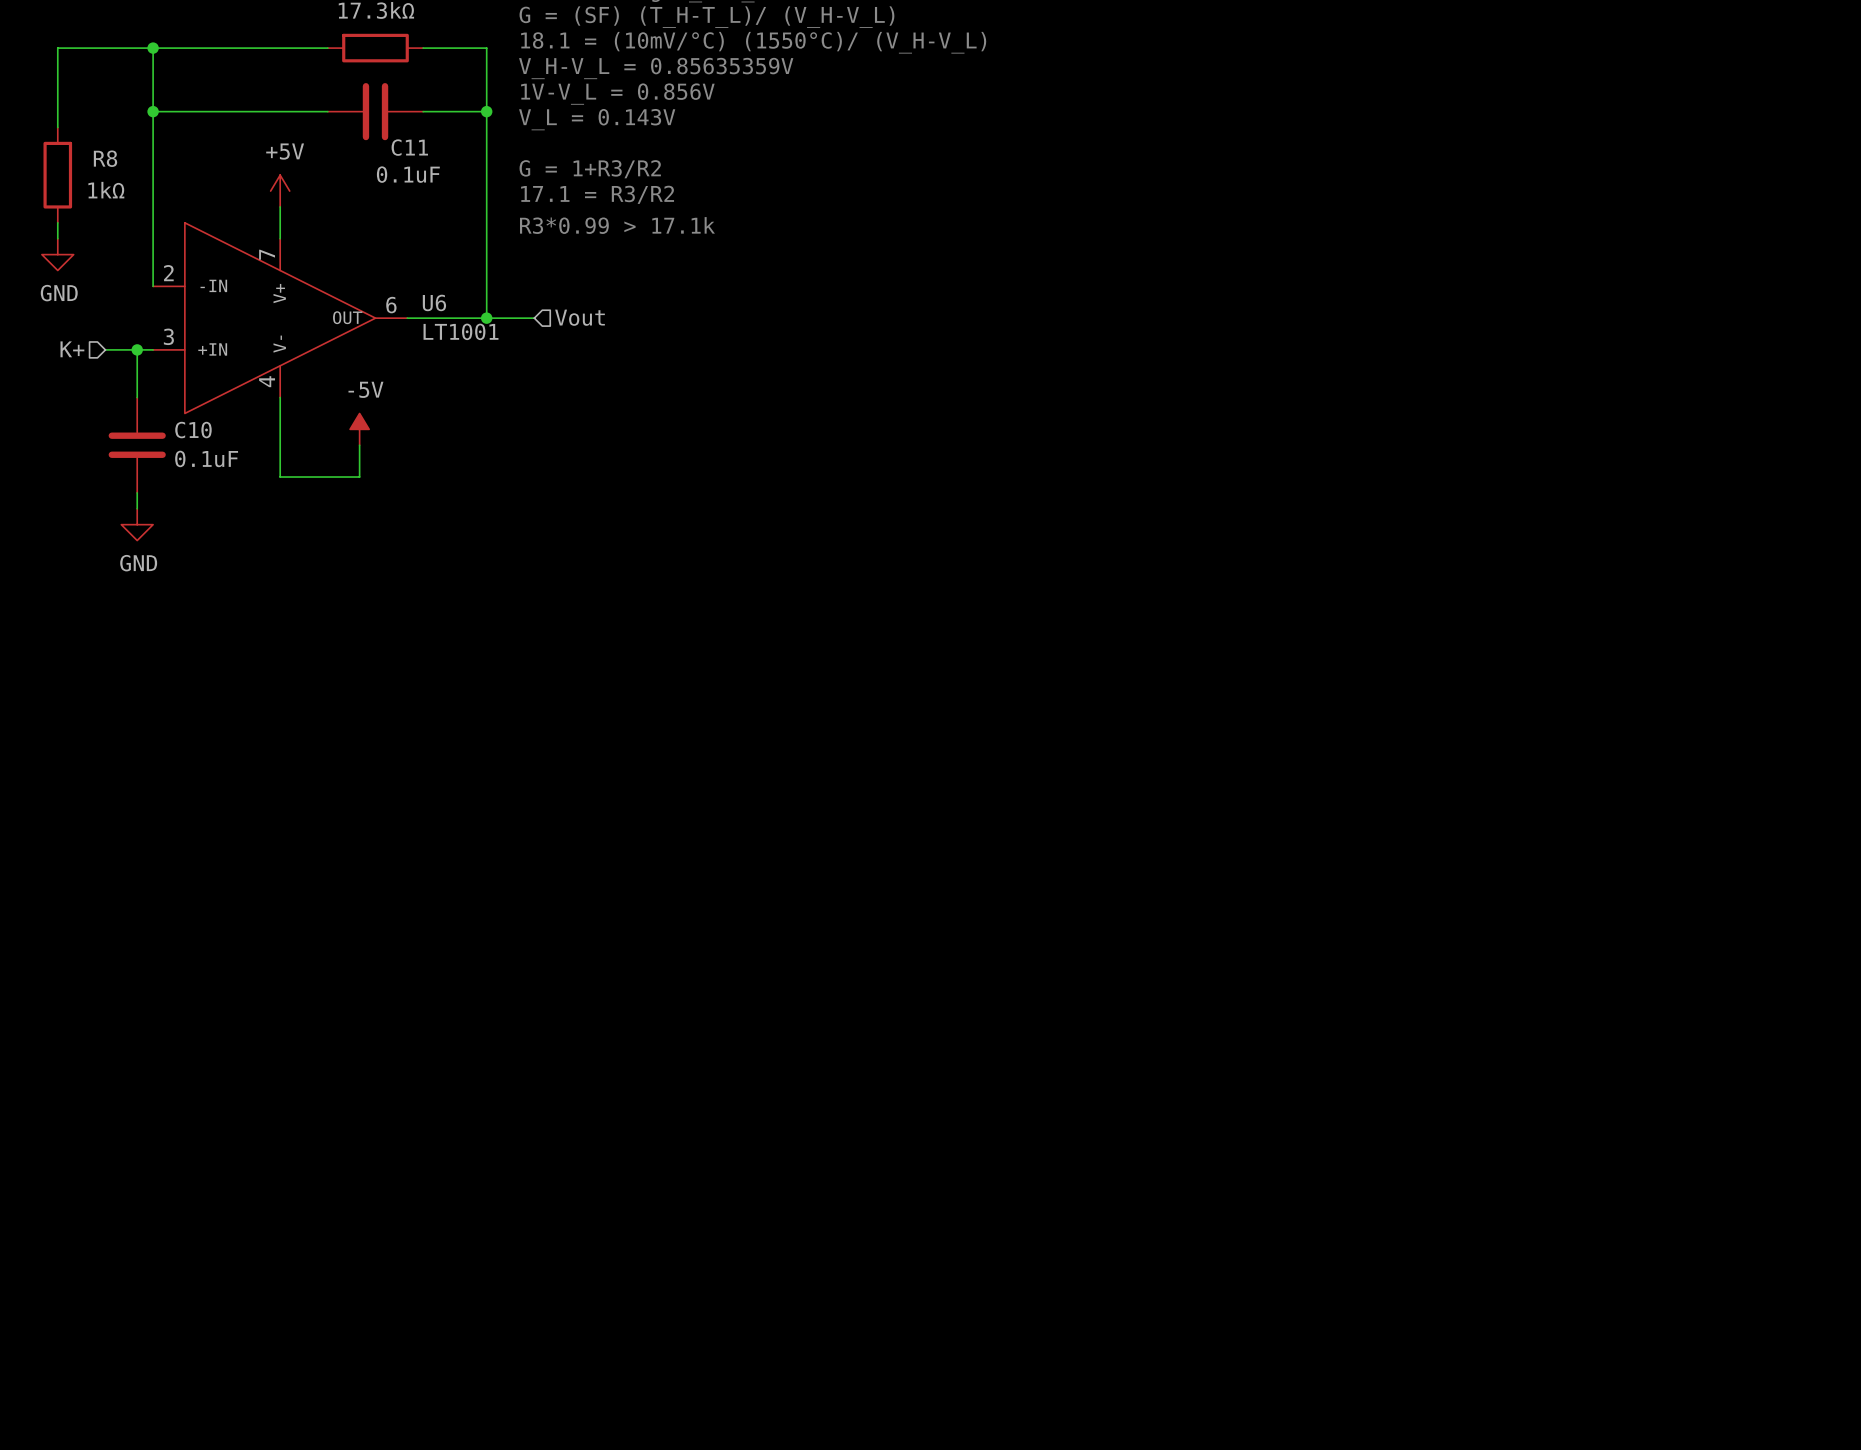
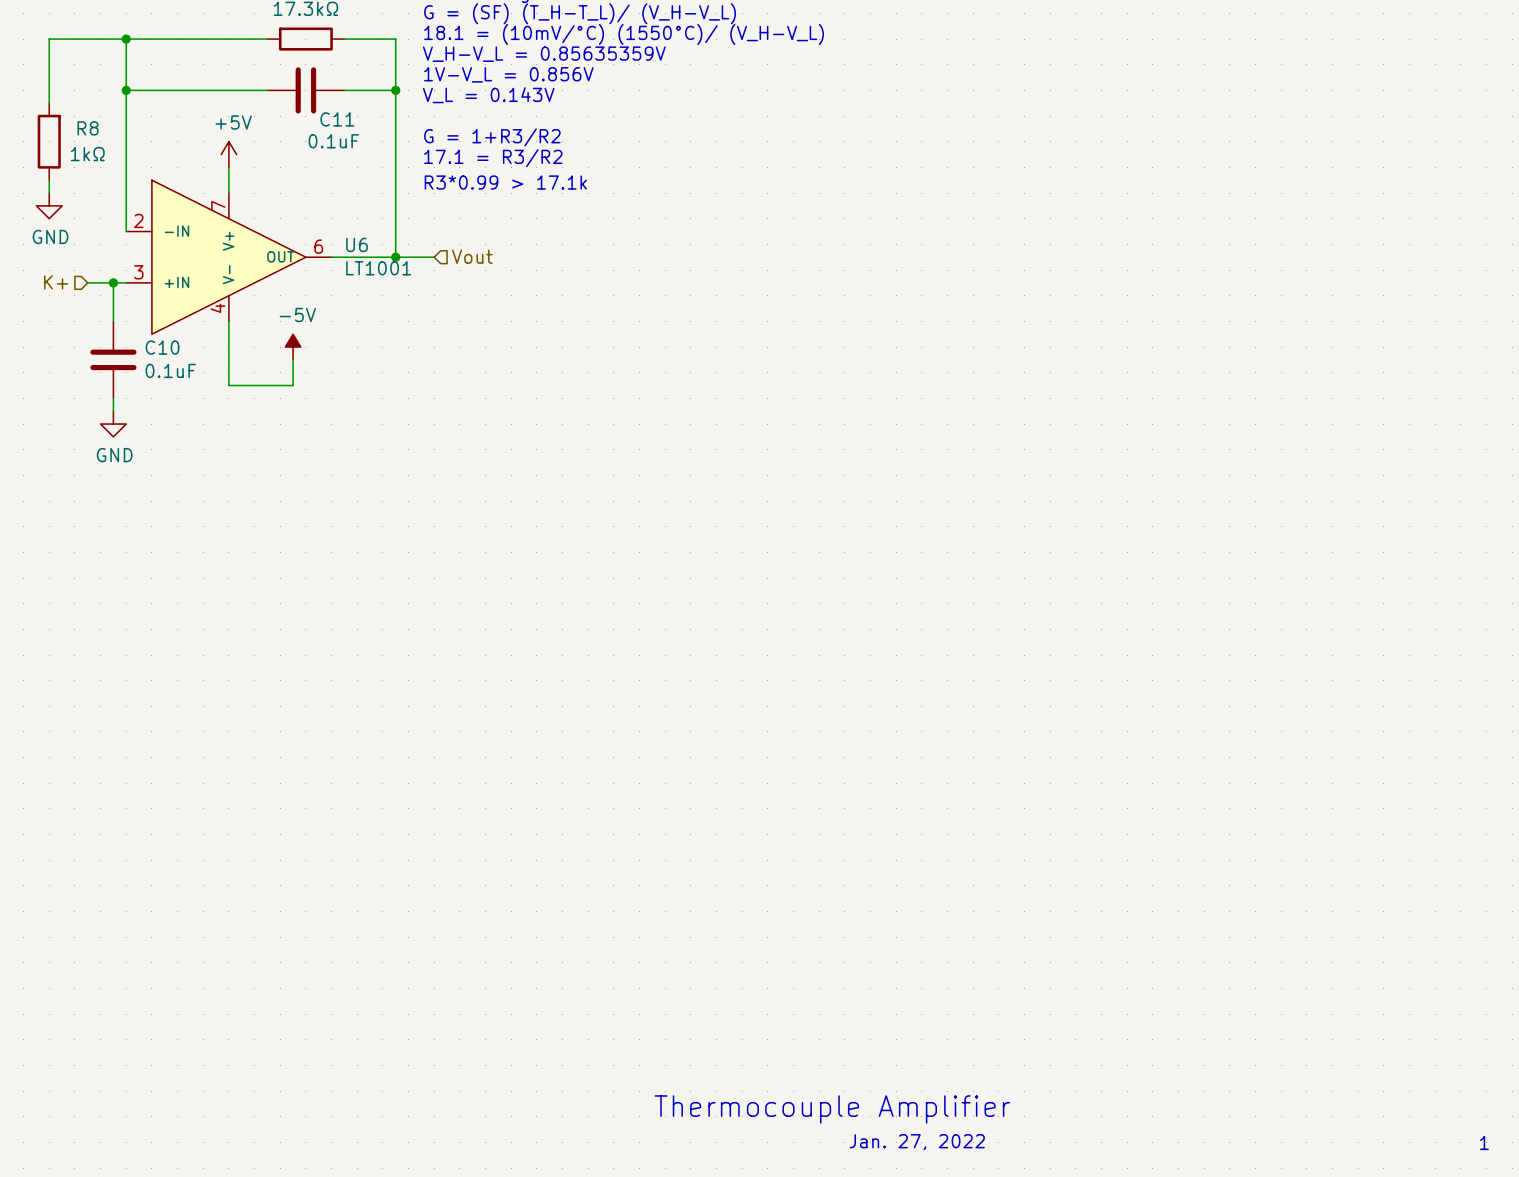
text: none -> Thermocouple Amplifier (832, 1109)
text: none -> Jan. 27, 2022 (917, 1142)
text: none -> 1 (1484, 1142)

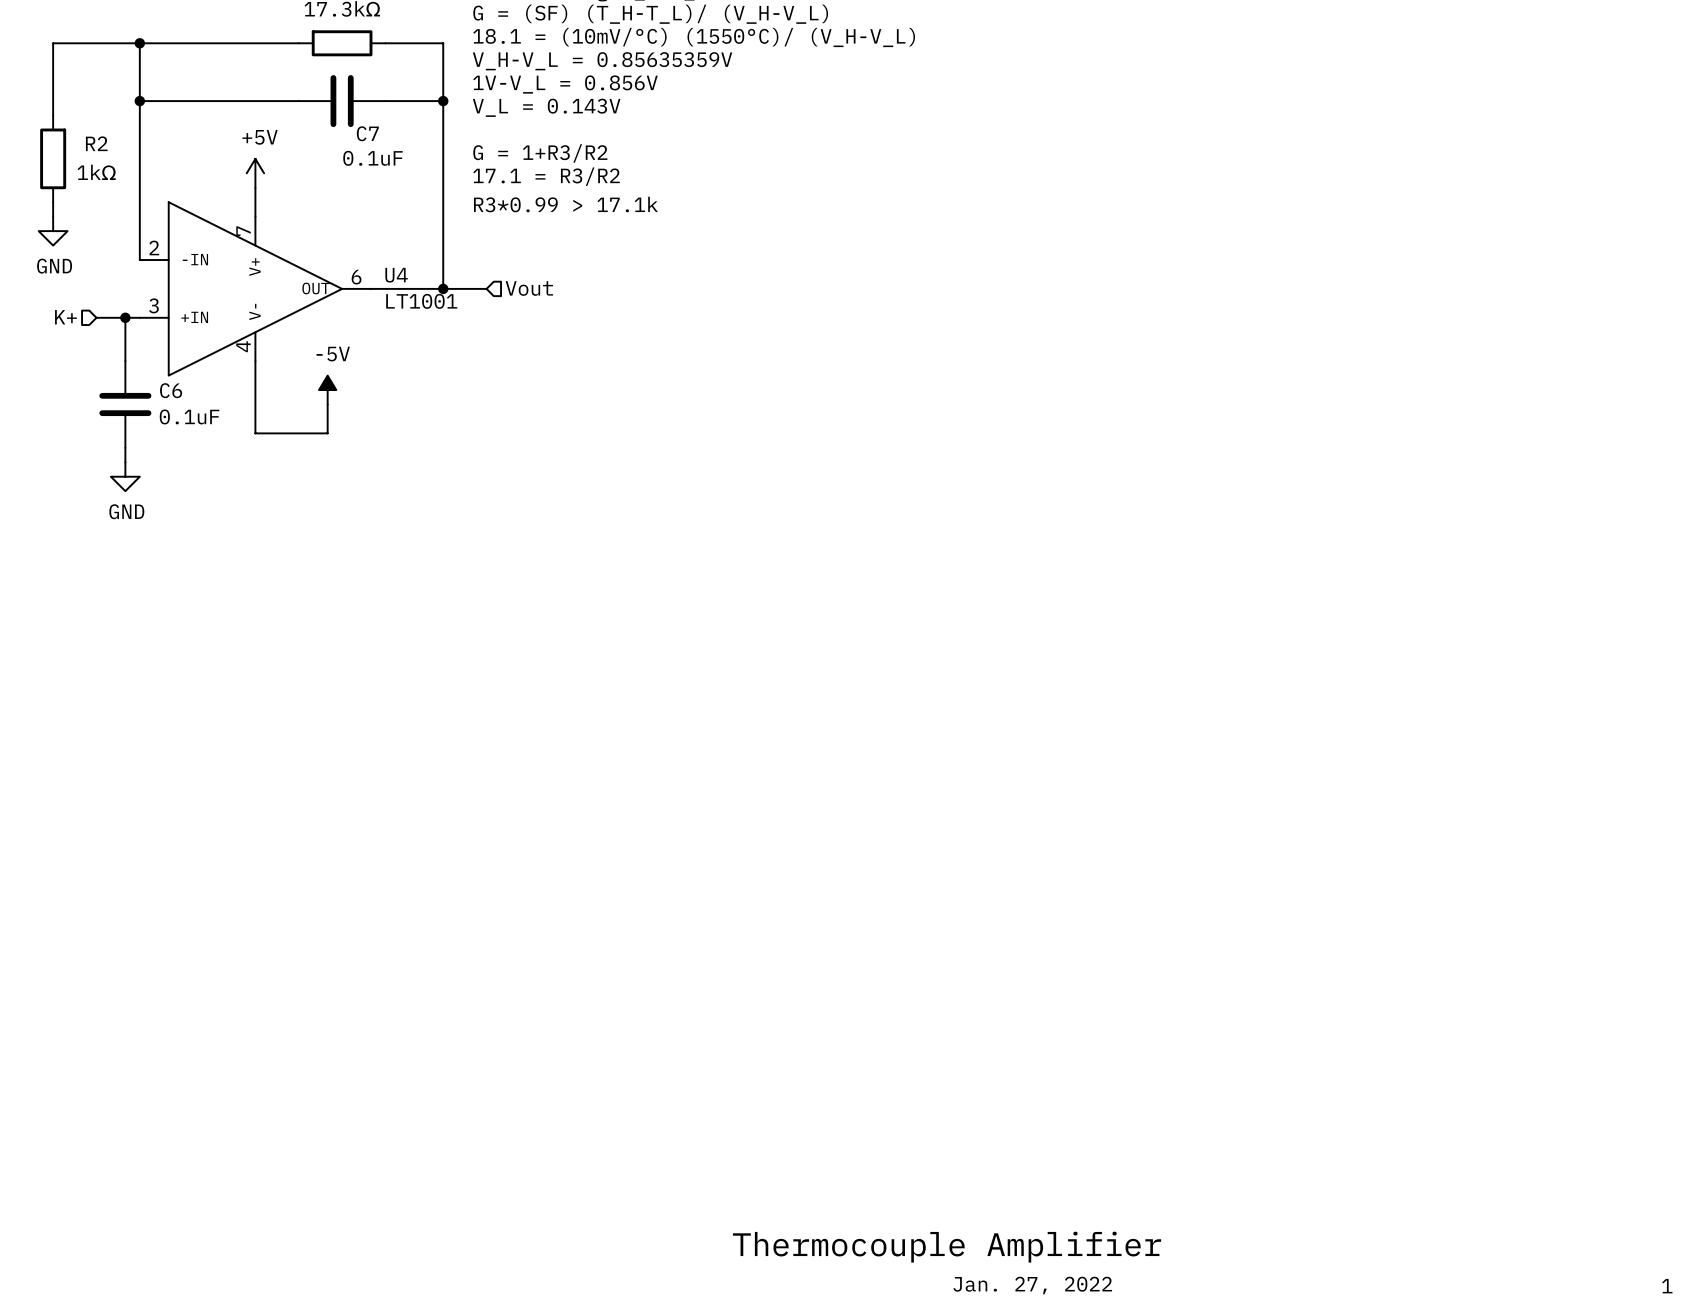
C11 name: C11 (337, 119) -> C7 (367, 133)
R8 name: R8 (88, 128) -> R2 (96, 143)
U6 name: U6 (357, 244) -> U4 (396, 275)
C10 name: C10 (162, 347) -> C6 (171, 390)

